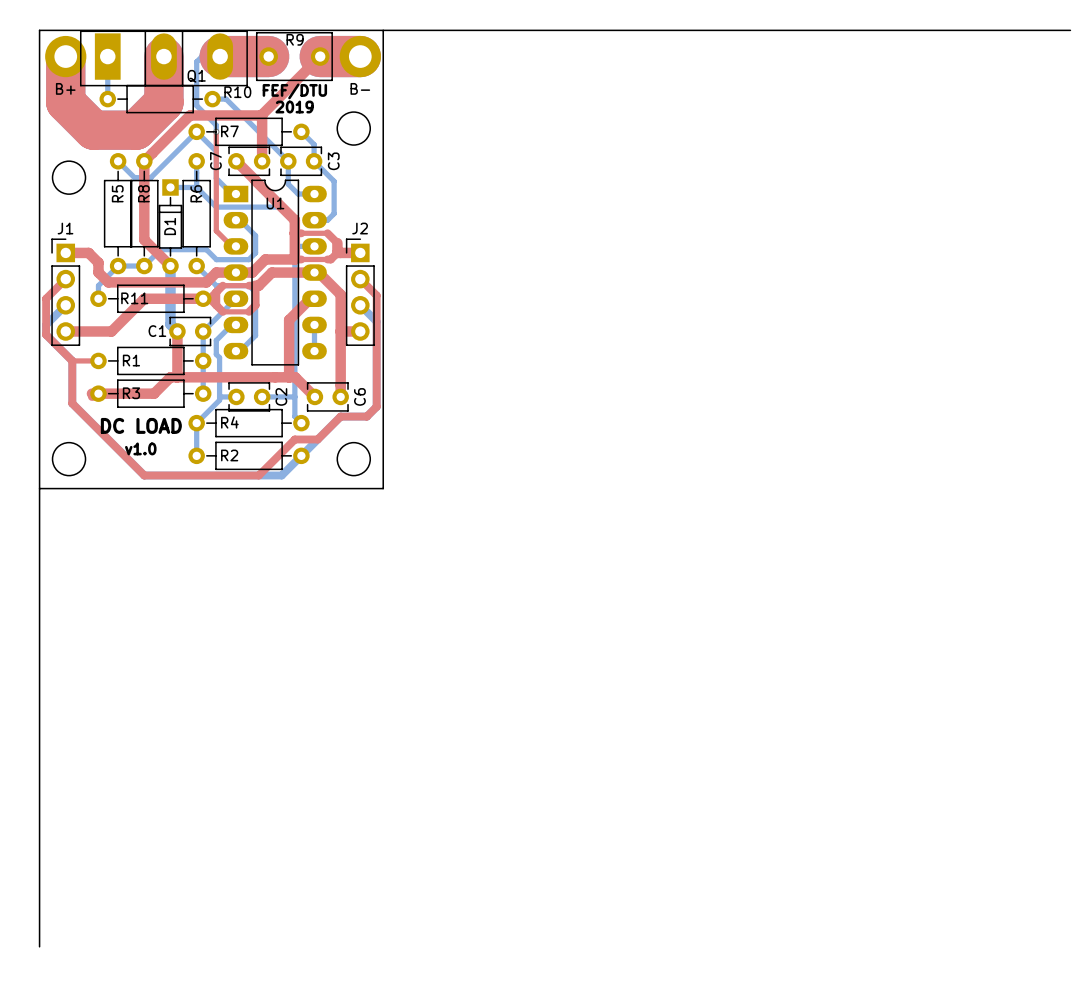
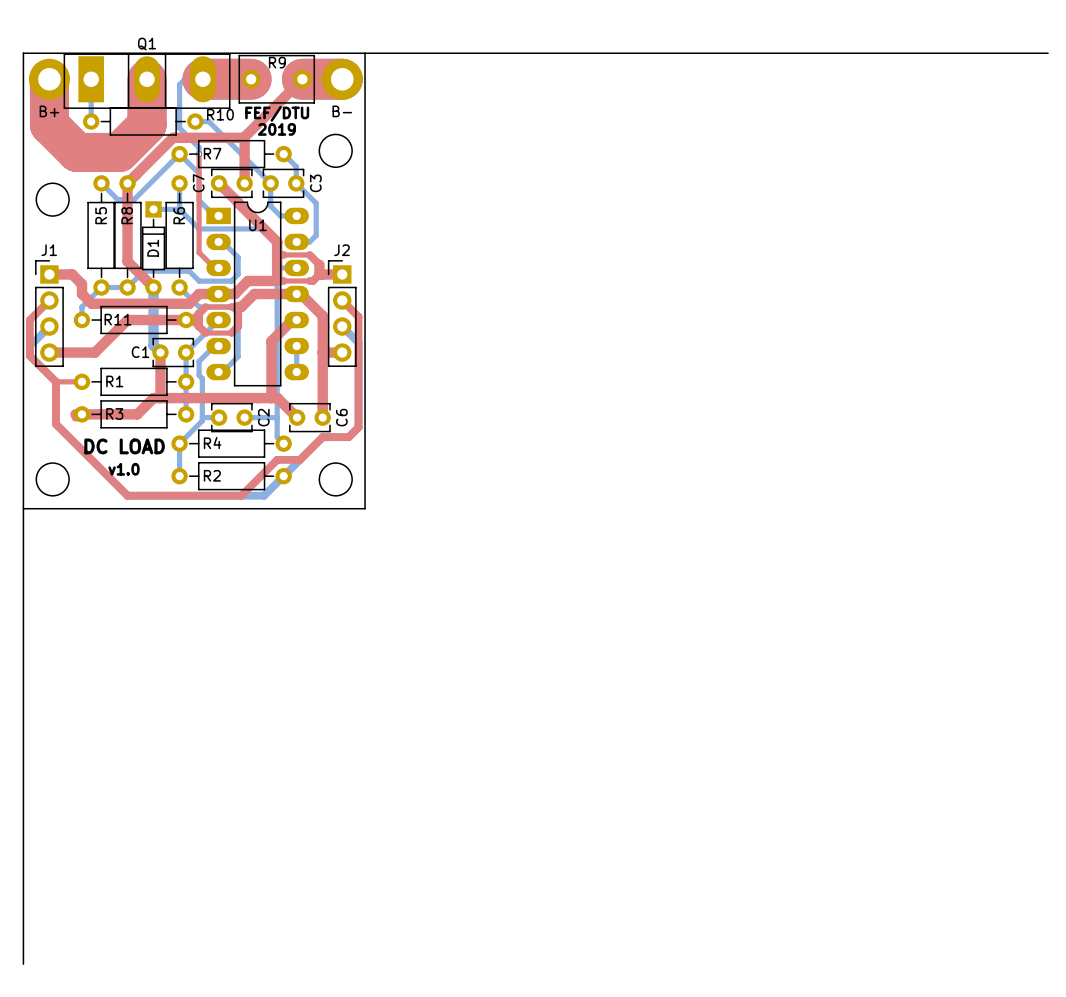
Q1 name position: Q1 (196, 76) -> Q1 (147, 44)

